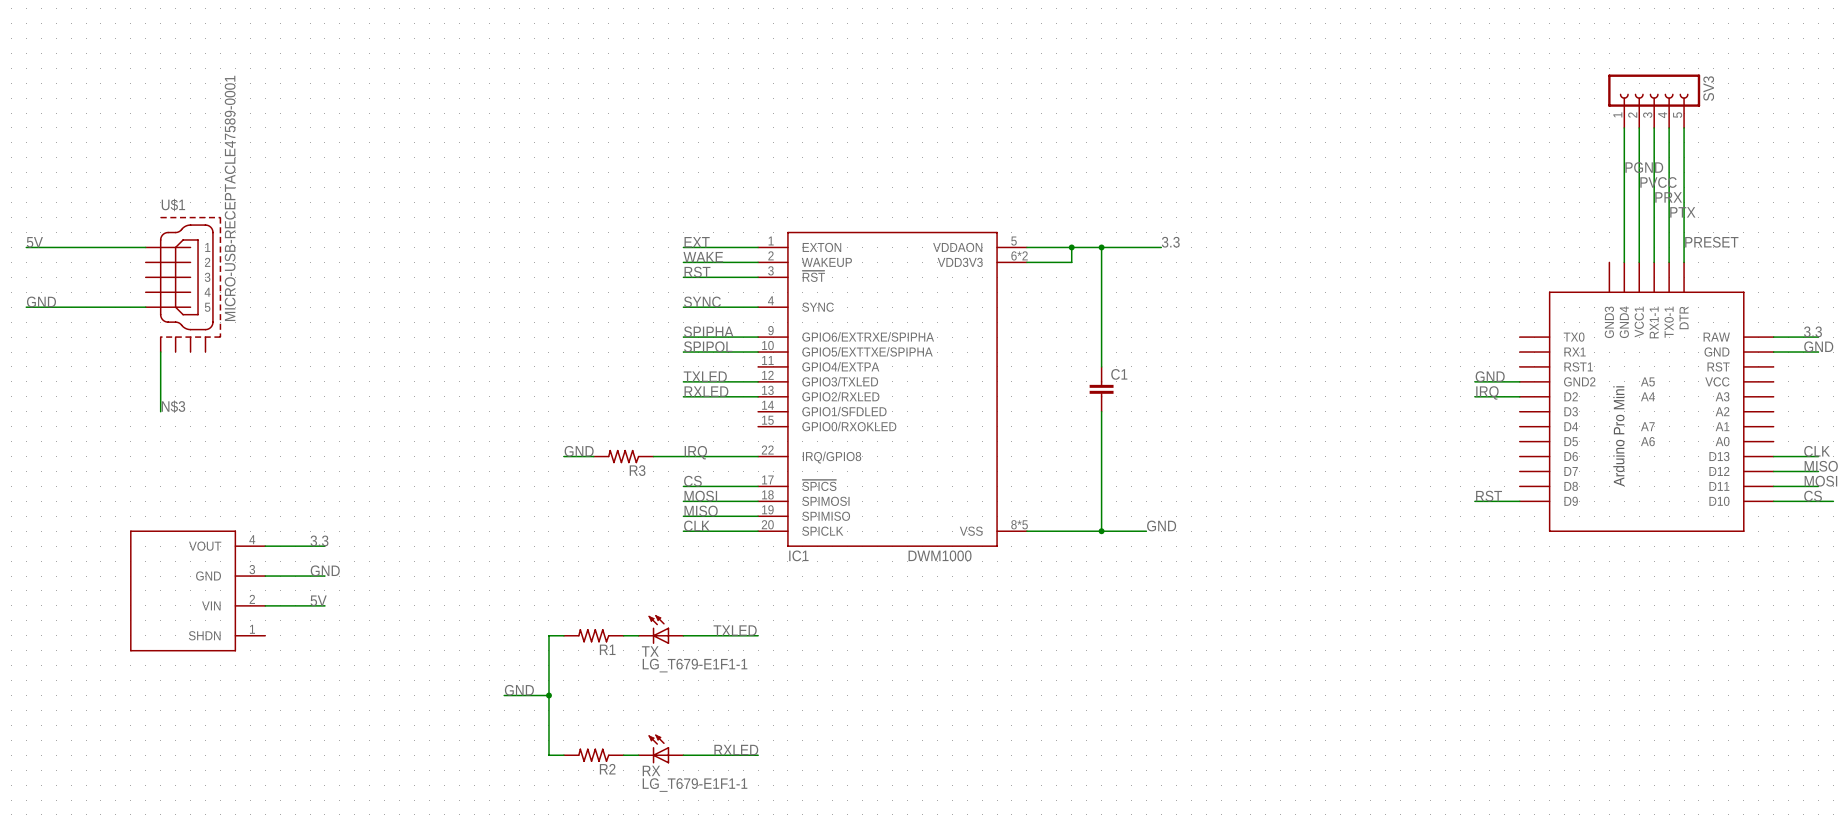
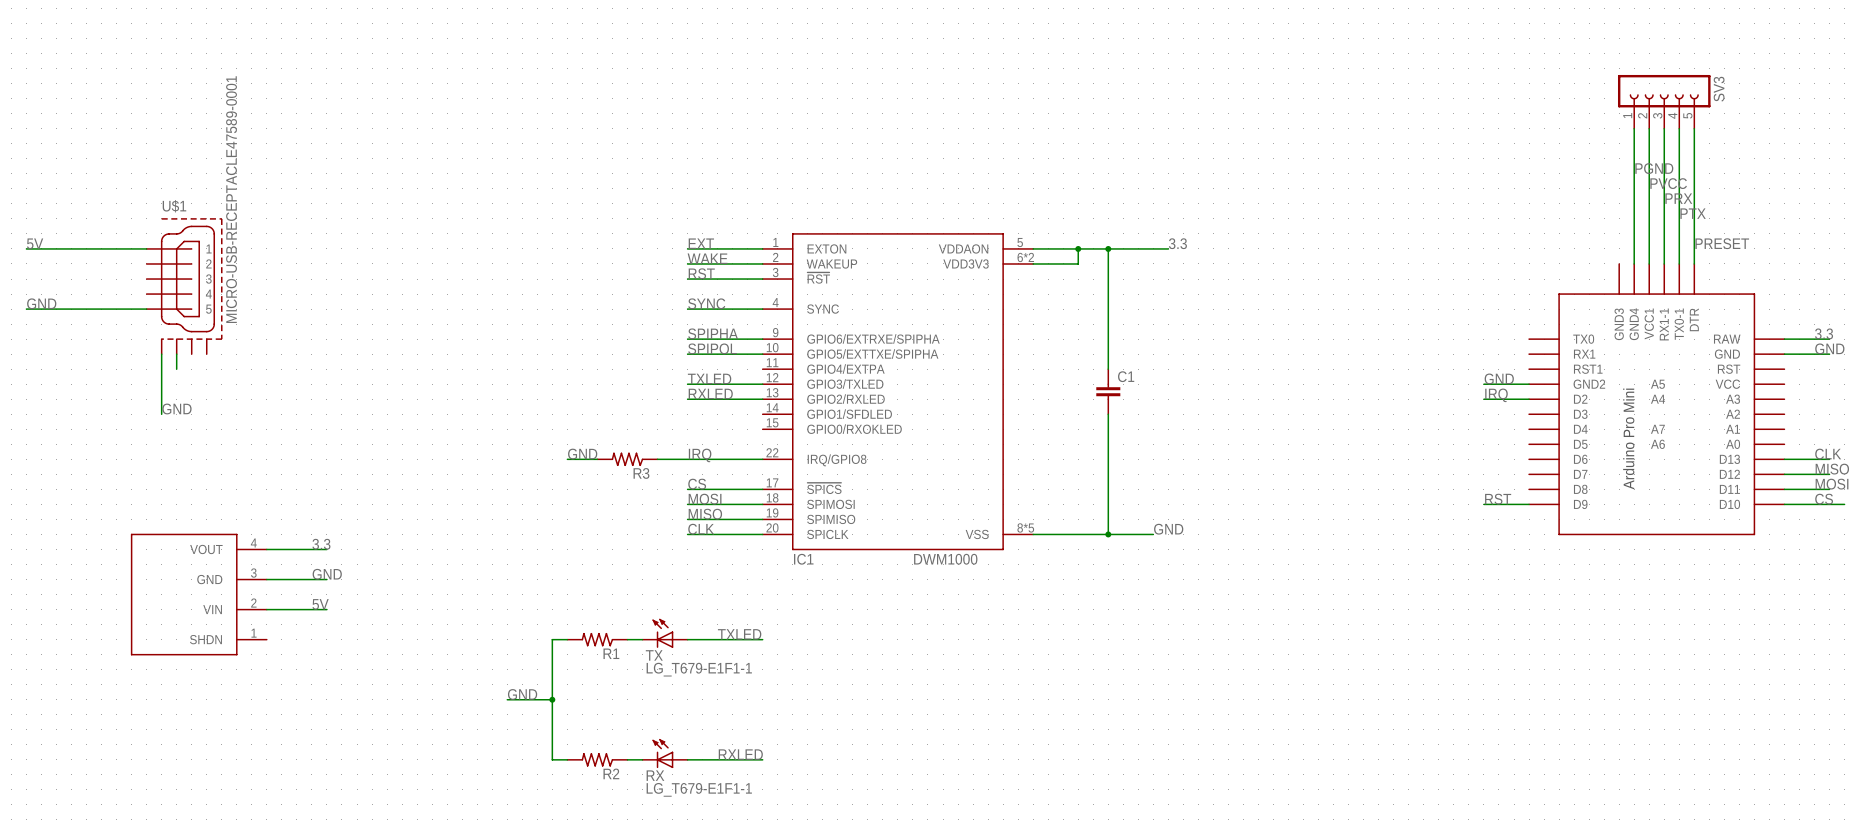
wire: none -> (176, 354) (176, 369)
label: N$3 (173, 406) -> GND (176, 408)

